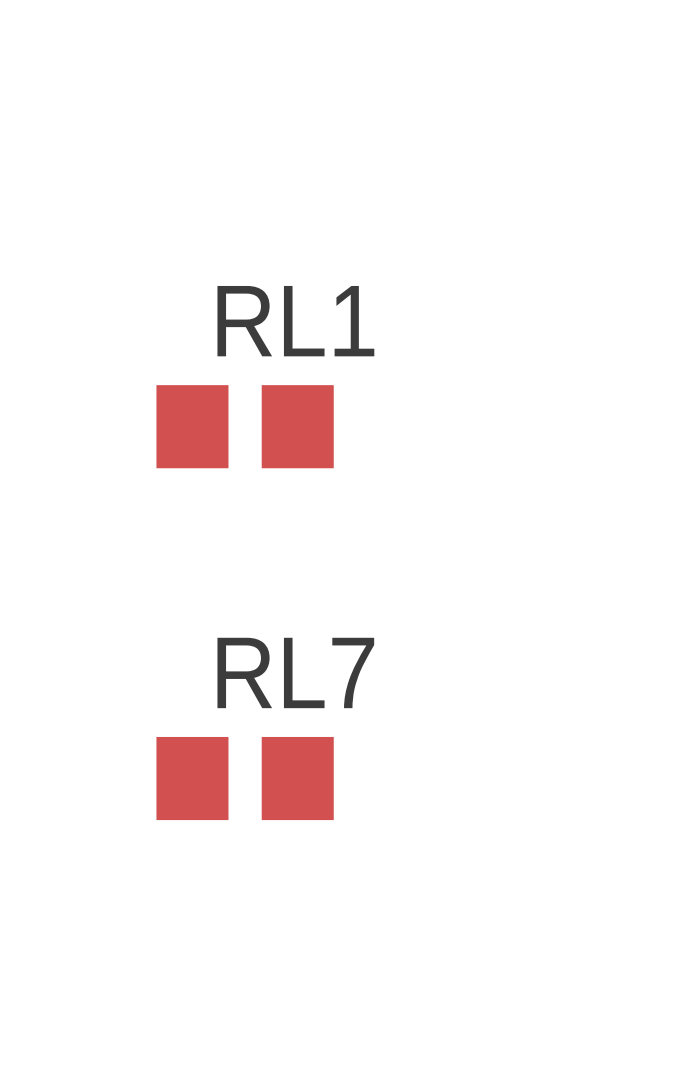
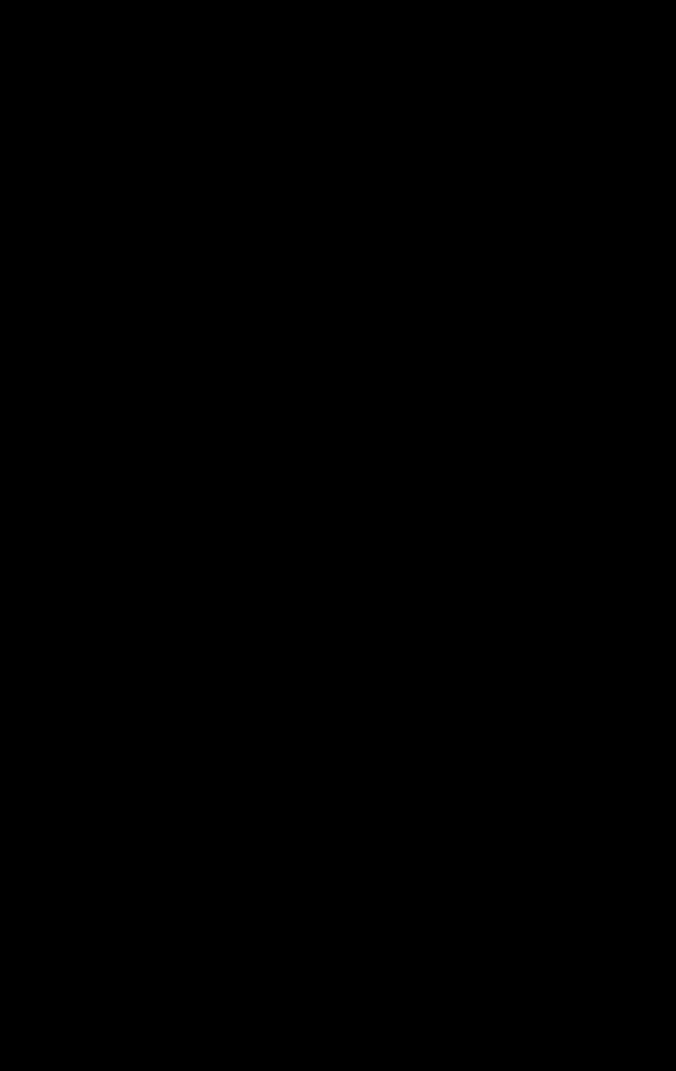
RL1: (245, 426) -> none
RL7: (245, 778) -> none

